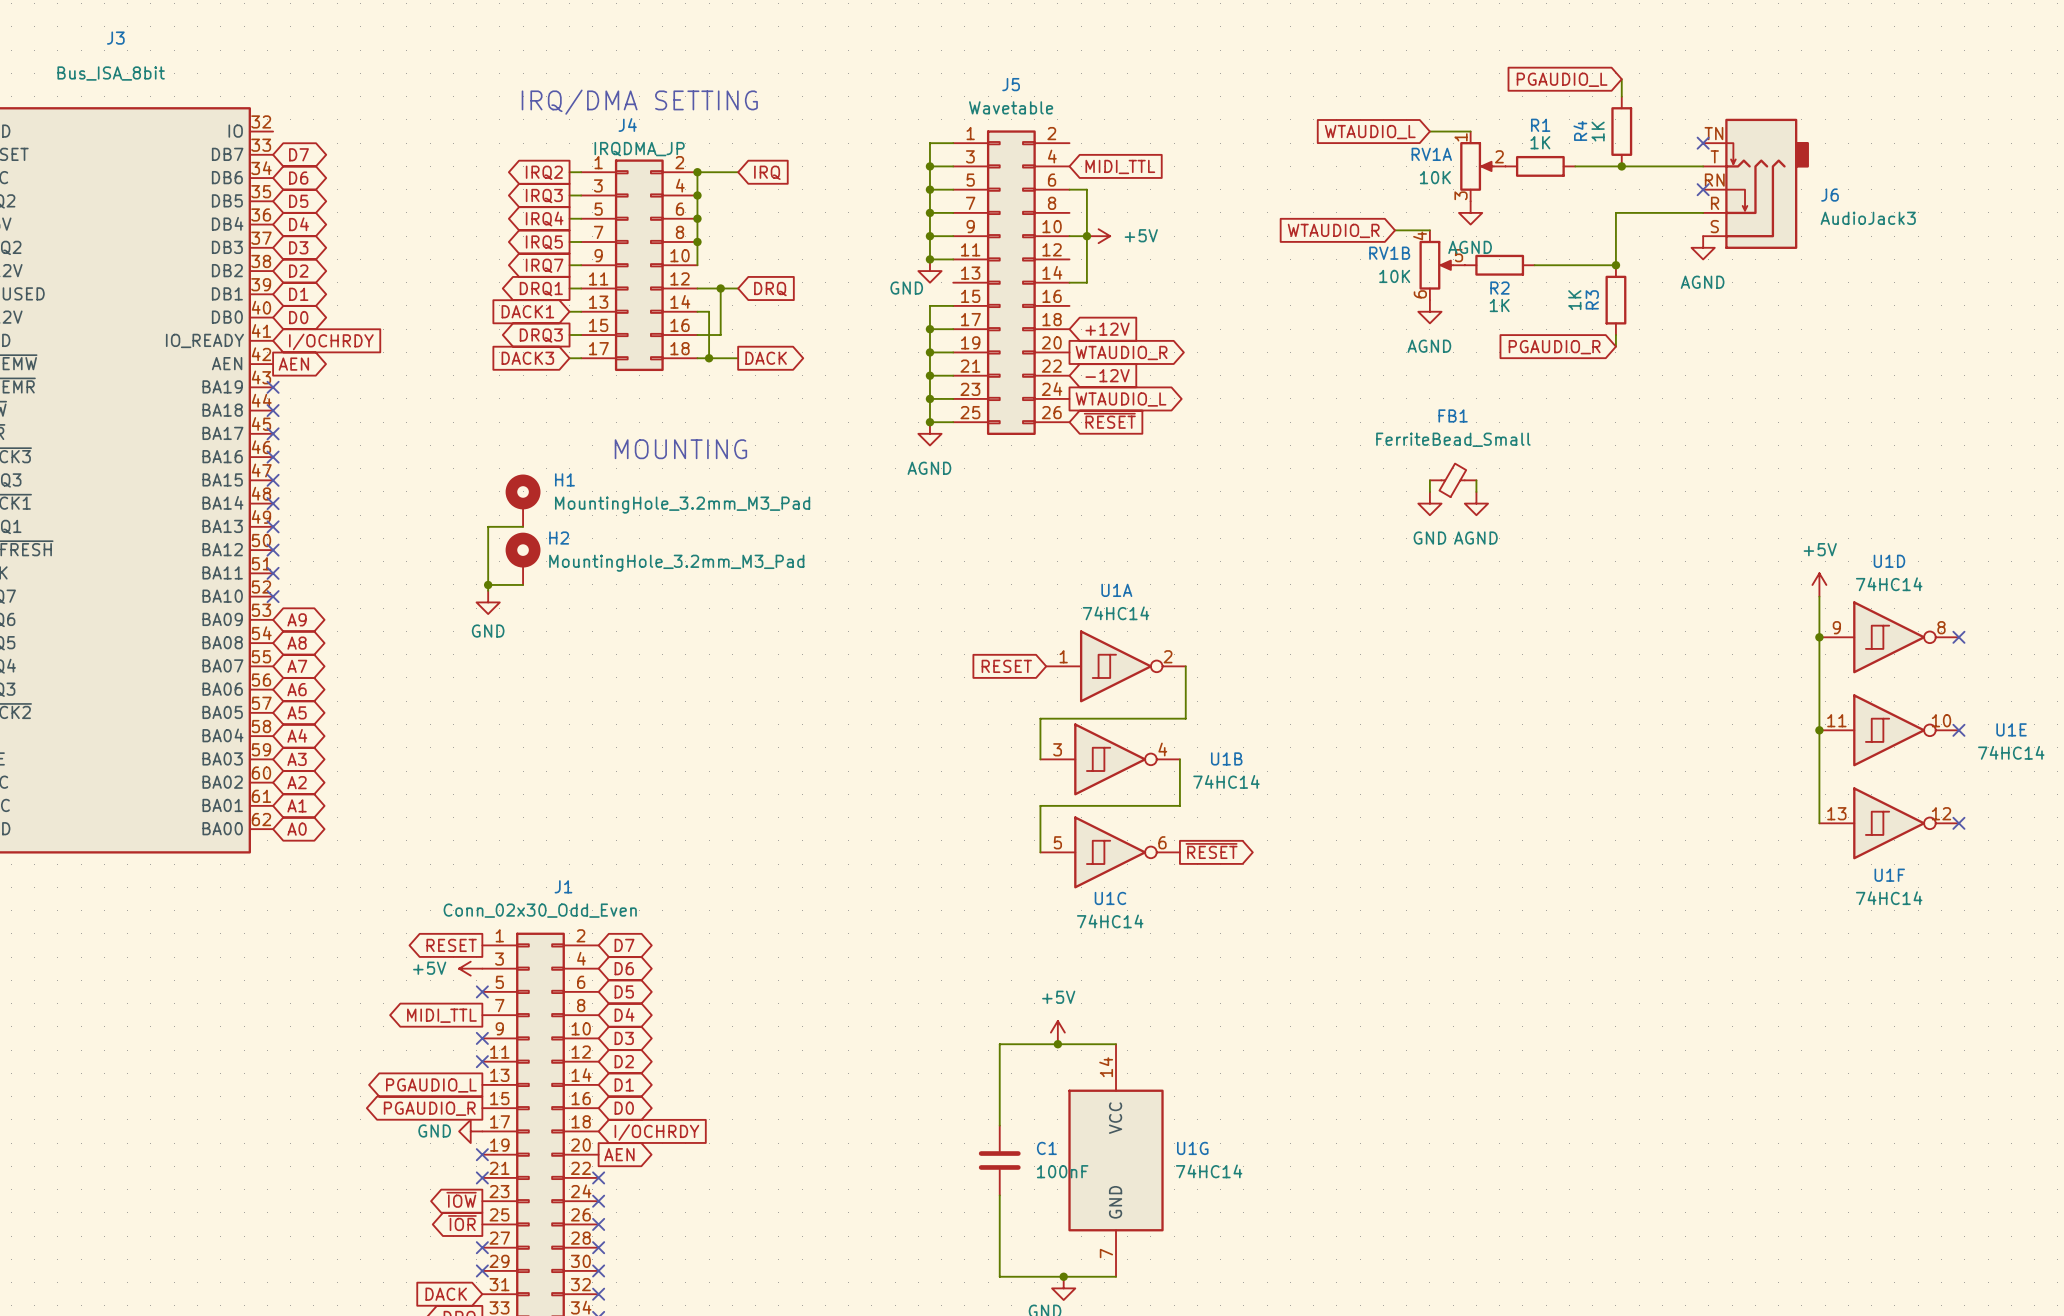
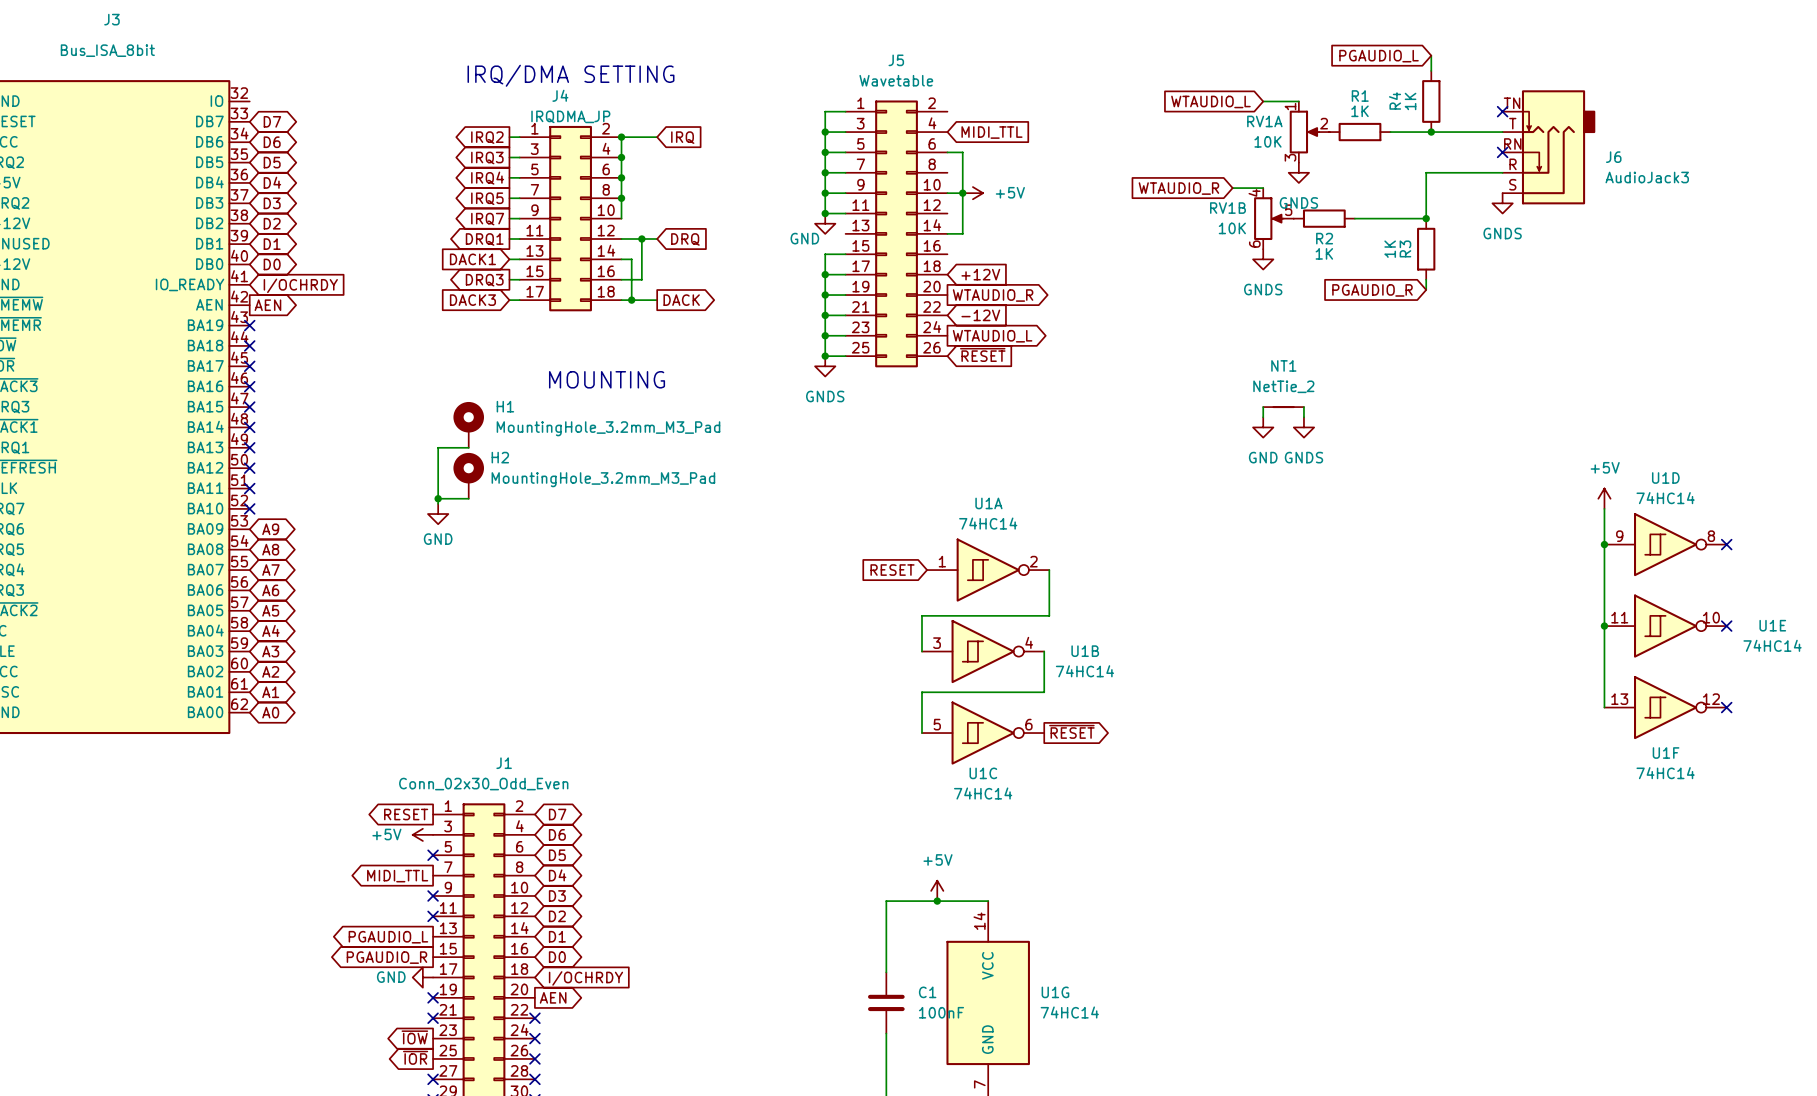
power symbol: AGND (1470, 212) -> GNDS (1298, 172)
power symbol: AGND (1703, 247) -> GNDS (1502, 203)
power symbol: AGND (1429, 311) -> GNDS (1263, 259)
power symbol: AGND (929, 433) -> GNDS (825, 366)
FB1: FerriteBead_Small (1453, 480) -> none
NT1: none -> NetTie_2 (1283, 407)
power symbol: AGND (1476, 503) -> GNDS (1303, 427)

